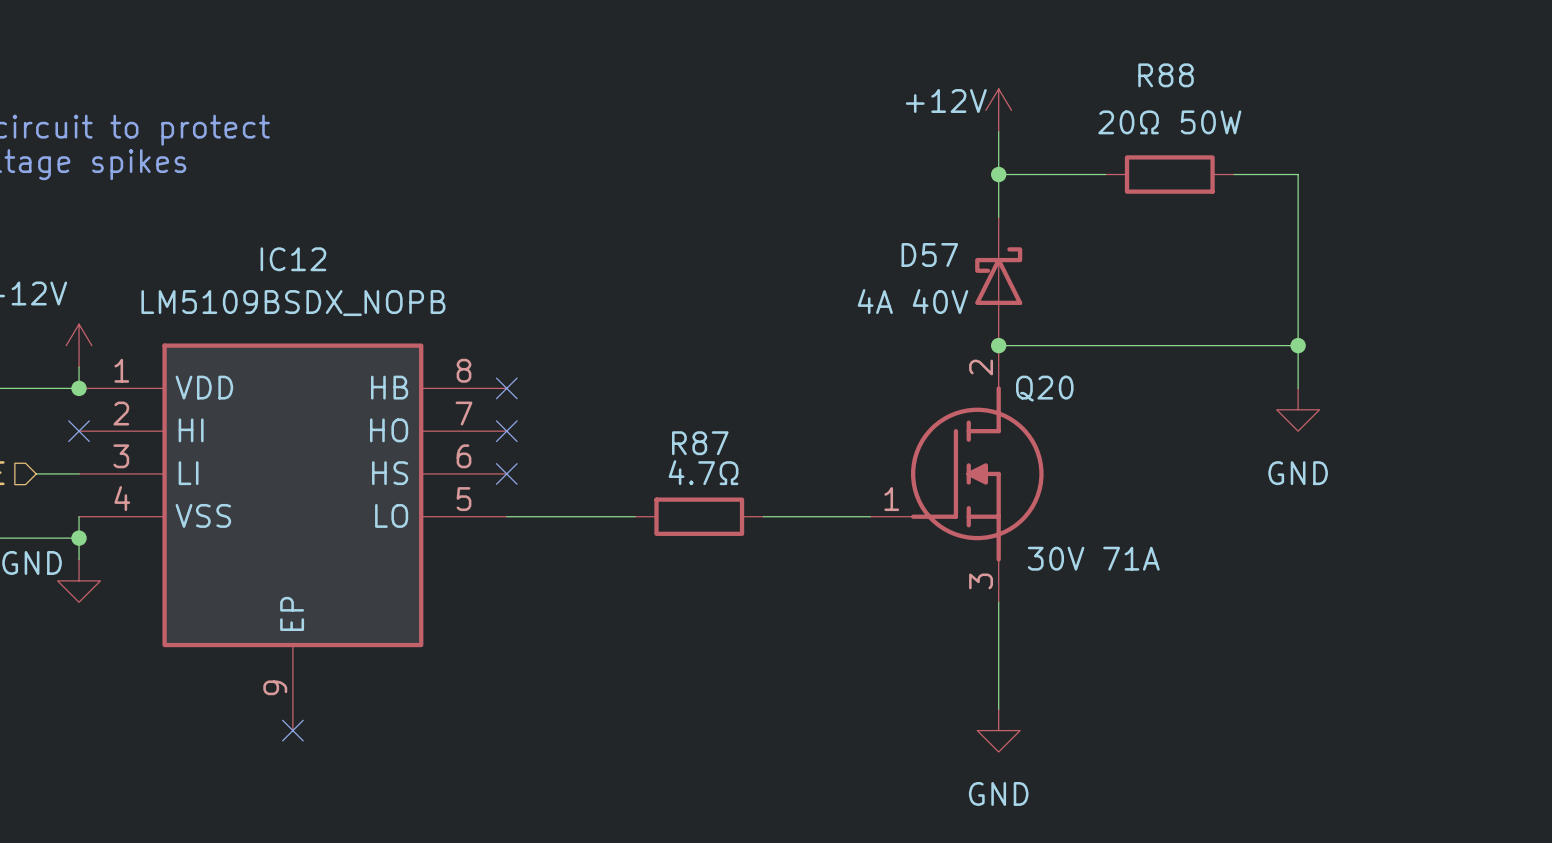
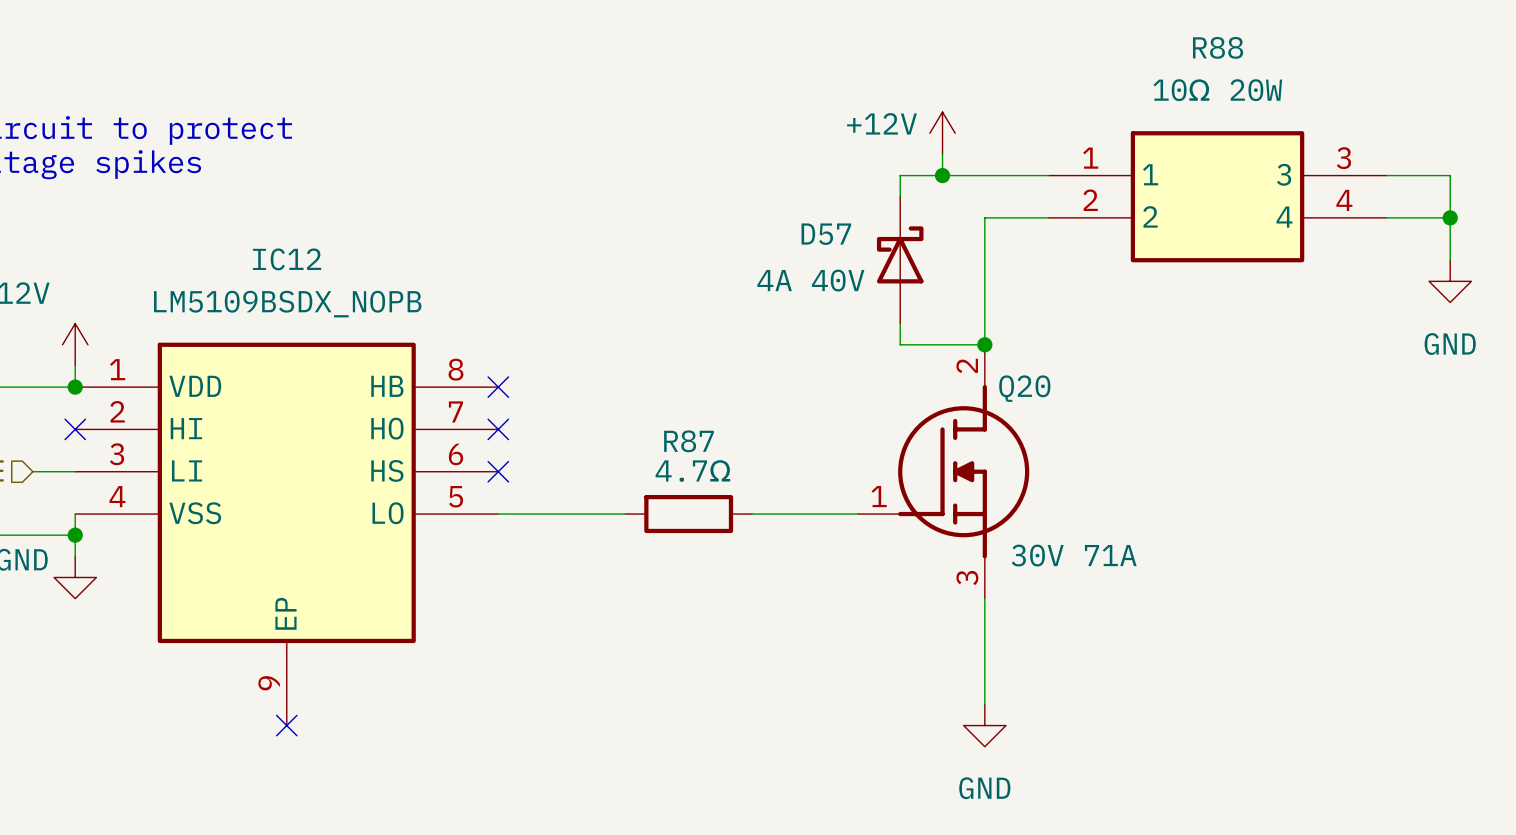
R88 name position: R88 (1166, 75) -> R88 (1218, 47)
power symbol position: +12V (998, 110) -> +12V (942, 133)
R88 value: 20Ω 50W (1169, 122) -> 10Ω 20W (1217, 90)
wire: (998, 131) (998, 217) -> none
wire: none -> (942, 154) (942, 175)
R88 symbol: [1105, 155, 1234, 194] -> [1048, 131, 1387, 263]
wire: none -> (984, 175) (900, 175) (900, 196)
junction position: (998, 174) -> (942, 175)
wire: (1233, 174) (1298, 174) (1298, 388) -> none
wire: none -> (1386, 175) (1450, 175) (1450, 260)
wire: none -> (1048, 217) (984, 217) (984, 344) (900, 344) (900, 323)
wire: none -> (1386, 217) (1450, 217)
junction: none -> (1450, 217)
D57 position: (998, 281) -> (900, 260)
wire: (998, 345) (1298, 345) -> none
junction: (1298, 345) -> none
power symbol position: GND (1298, 409) -> GND (1450, 281)

